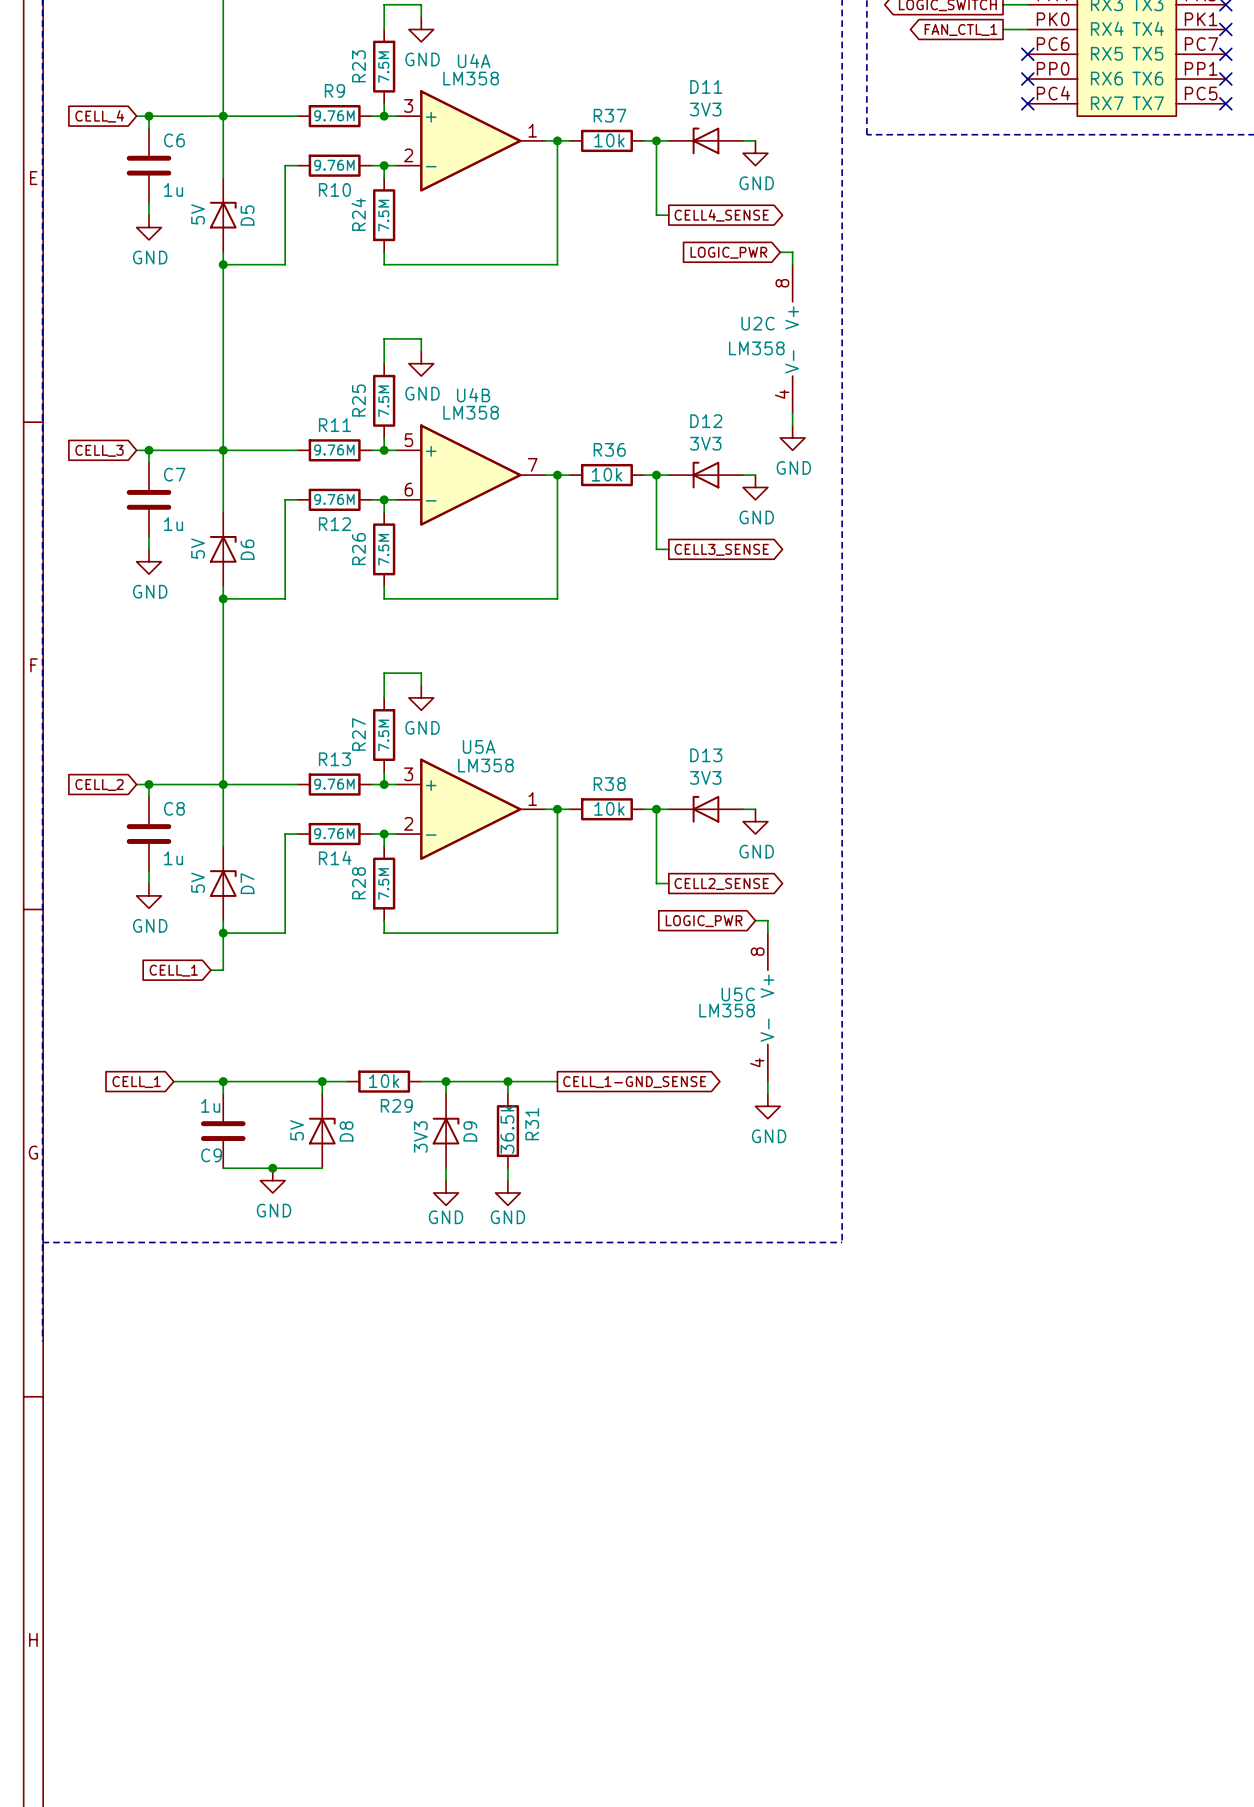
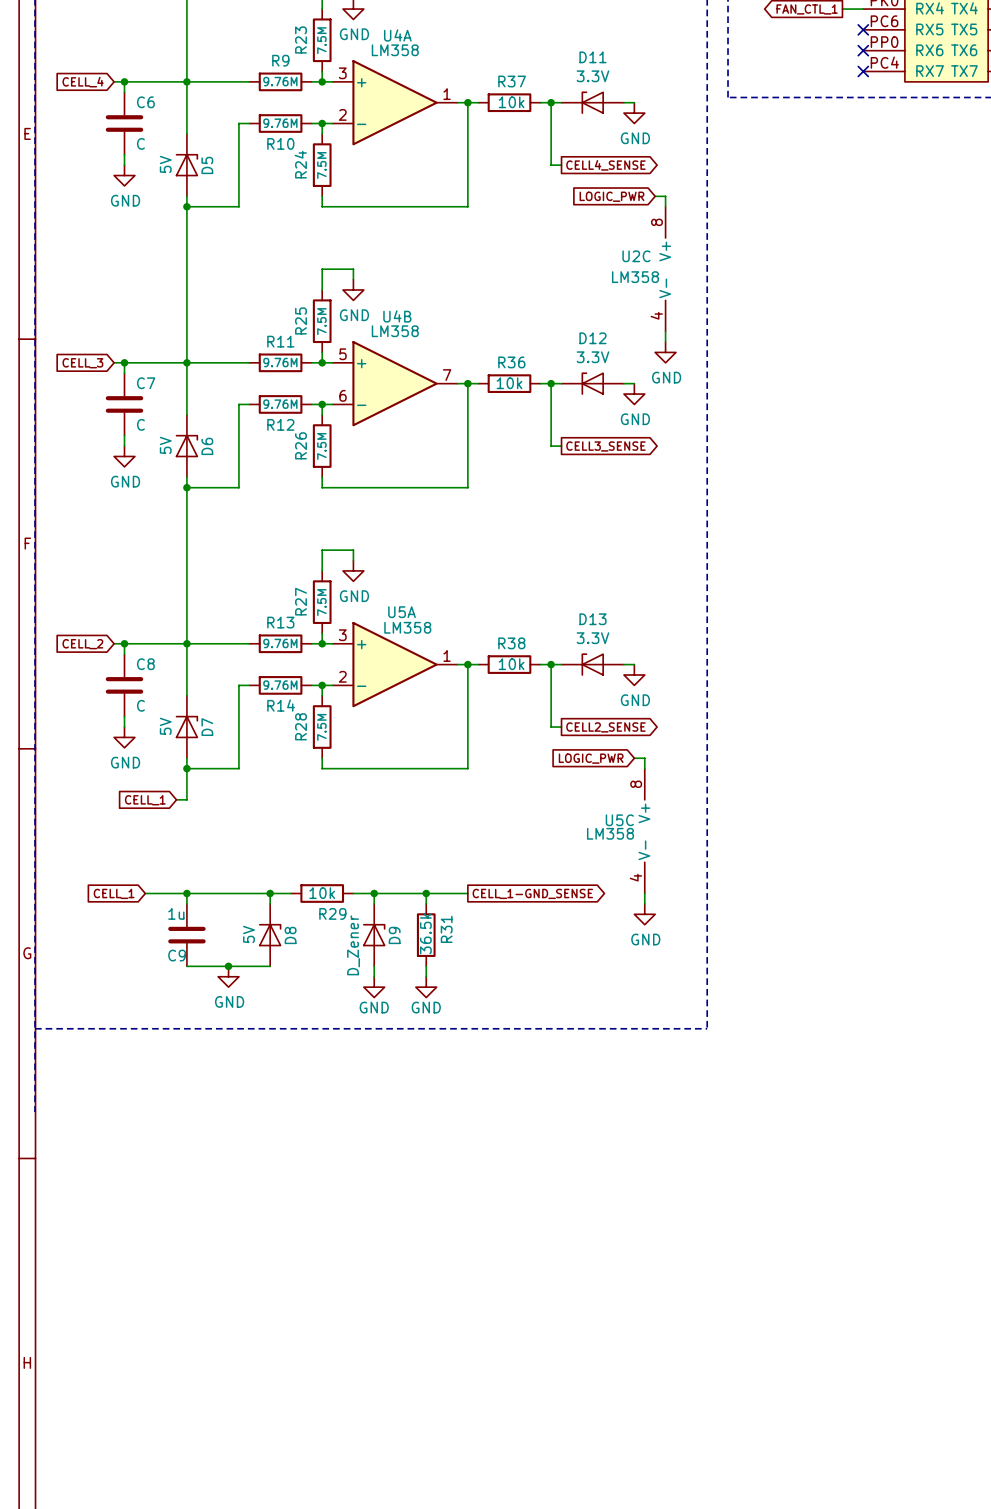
D11 value: 3V3 (705, 109) -> 3.3V (592, 76)
C6 value: 1u (173, 189) -> C (140, 143)
D12 value: 3V3 (705, 443) -> 3.3V (592, 357)
C7 value: 1u (173, 524) -> C (140, 424)
D13 value: 3V3 (705, 777) -> 3.3V (592, 638)
C8 value: 1u (173, 858) -> C (140, 705)
D9 value: 3V3 (420, 1137) -> D_Zener (353, 945)

